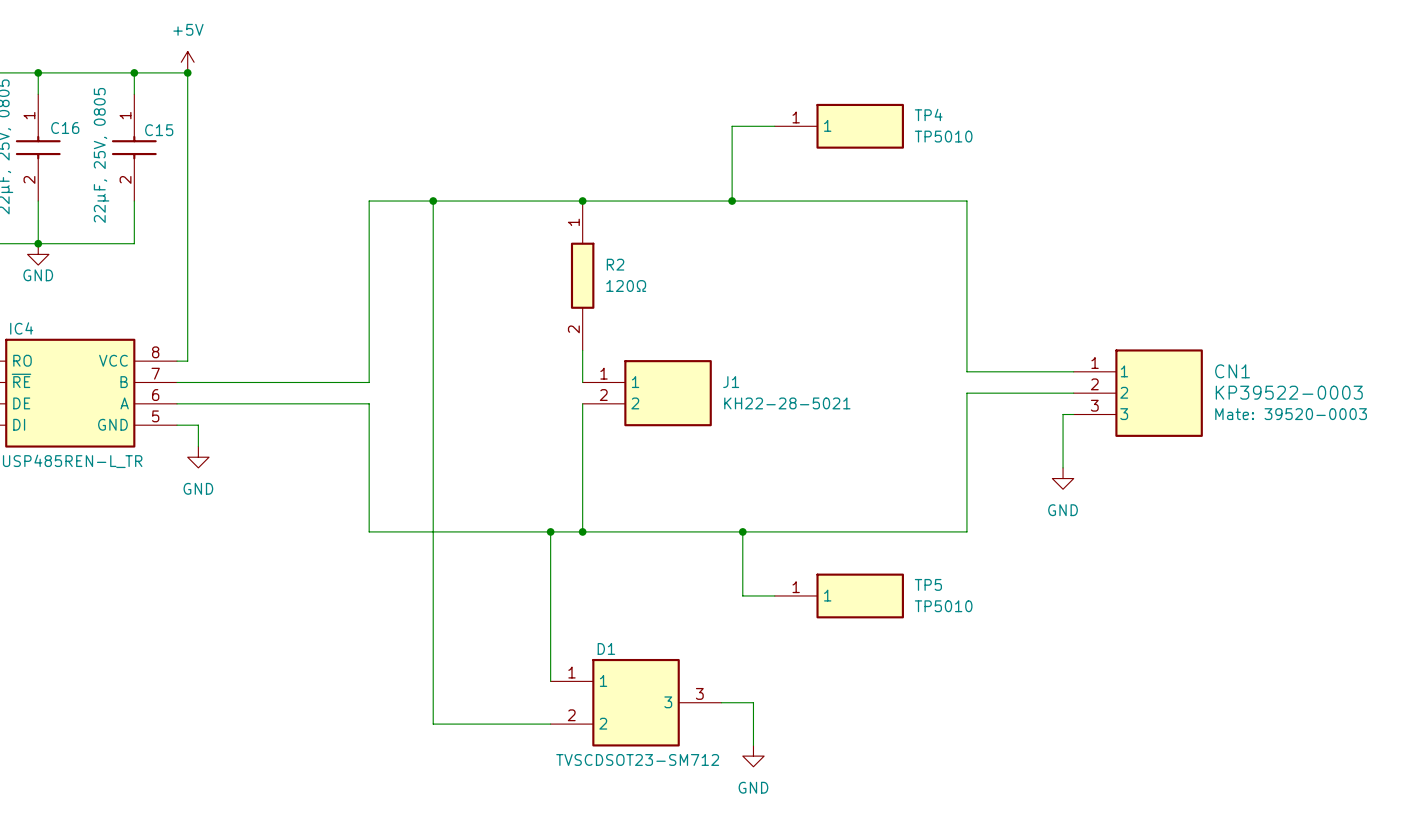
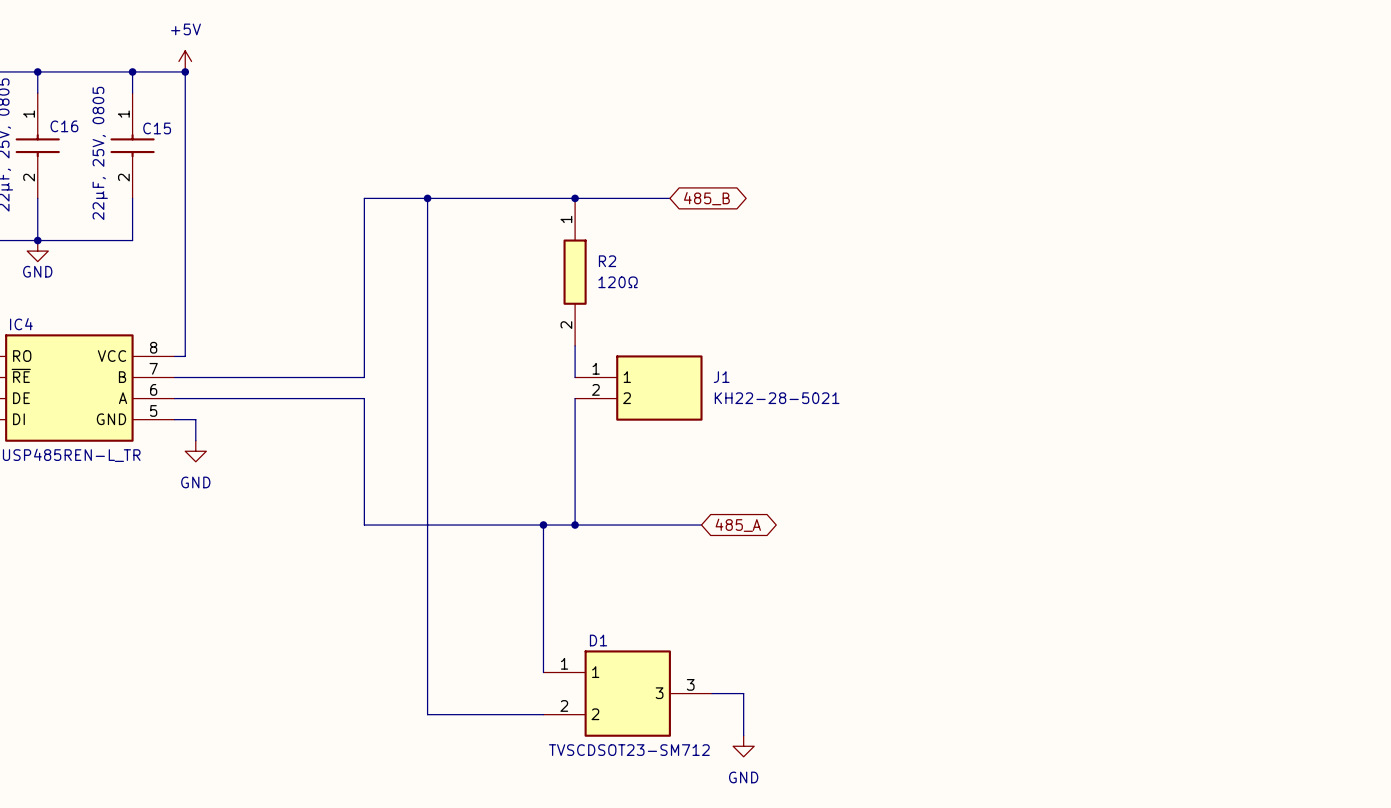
wire: (774, 126) (732, 126) (732, 201) -> none
TP4: TP5010 (839, 126) -> none
wire: (678, 201) (966, 201) (966, 371) (1073, 371) -> none
global label: none -> 485_B (706, 198)
junction: (732, 201) -> none
wire: (1073, 393) (966, 393) (966, 531) (710, 531) -> none
CN1: KP39522-0003 (1138, 393) -> none
wire: (1073, 414) (1063, 414) (1063, 467) -> none
power symbol: GND (1063, 478) -> none
wire: (742, 531) (742, 595) (774, 595) -> none
junction: (742, 531) -> none
global label: none -> 485_A (738, 525)
TP5: TP5010 (839, 595) -> none

